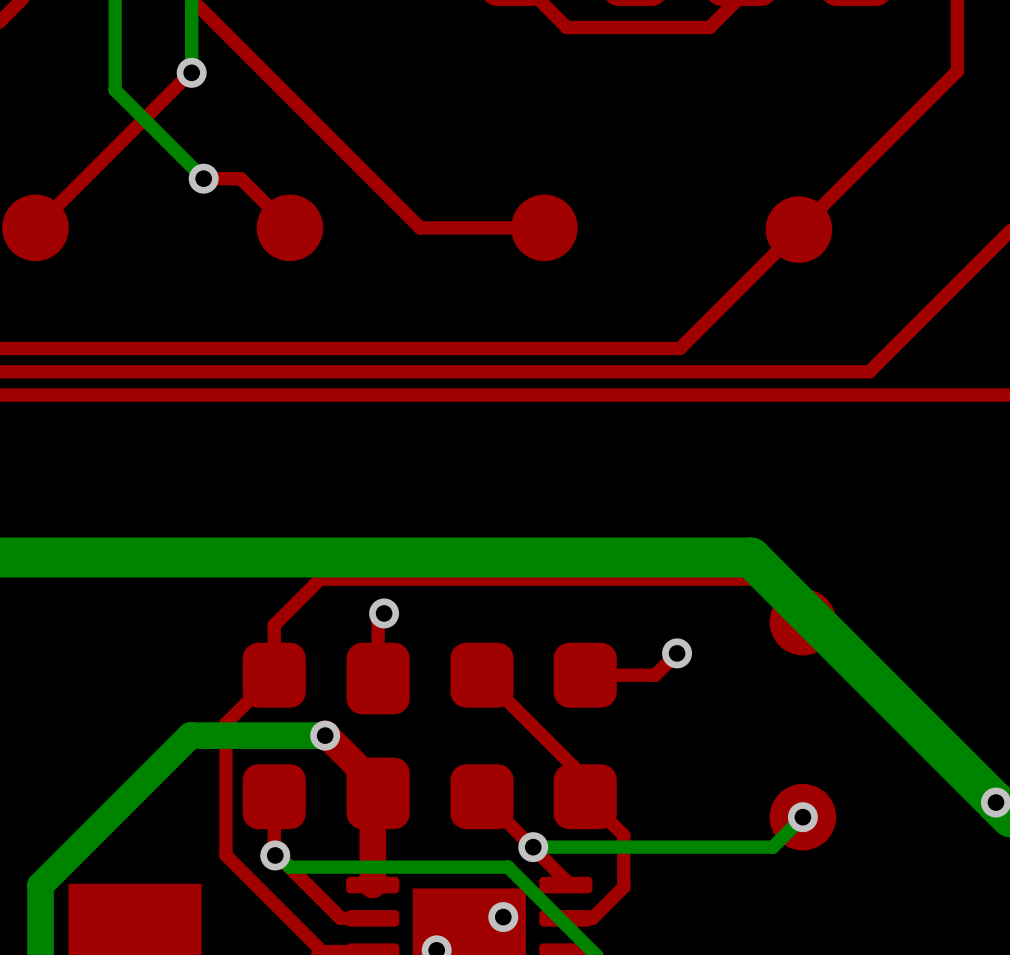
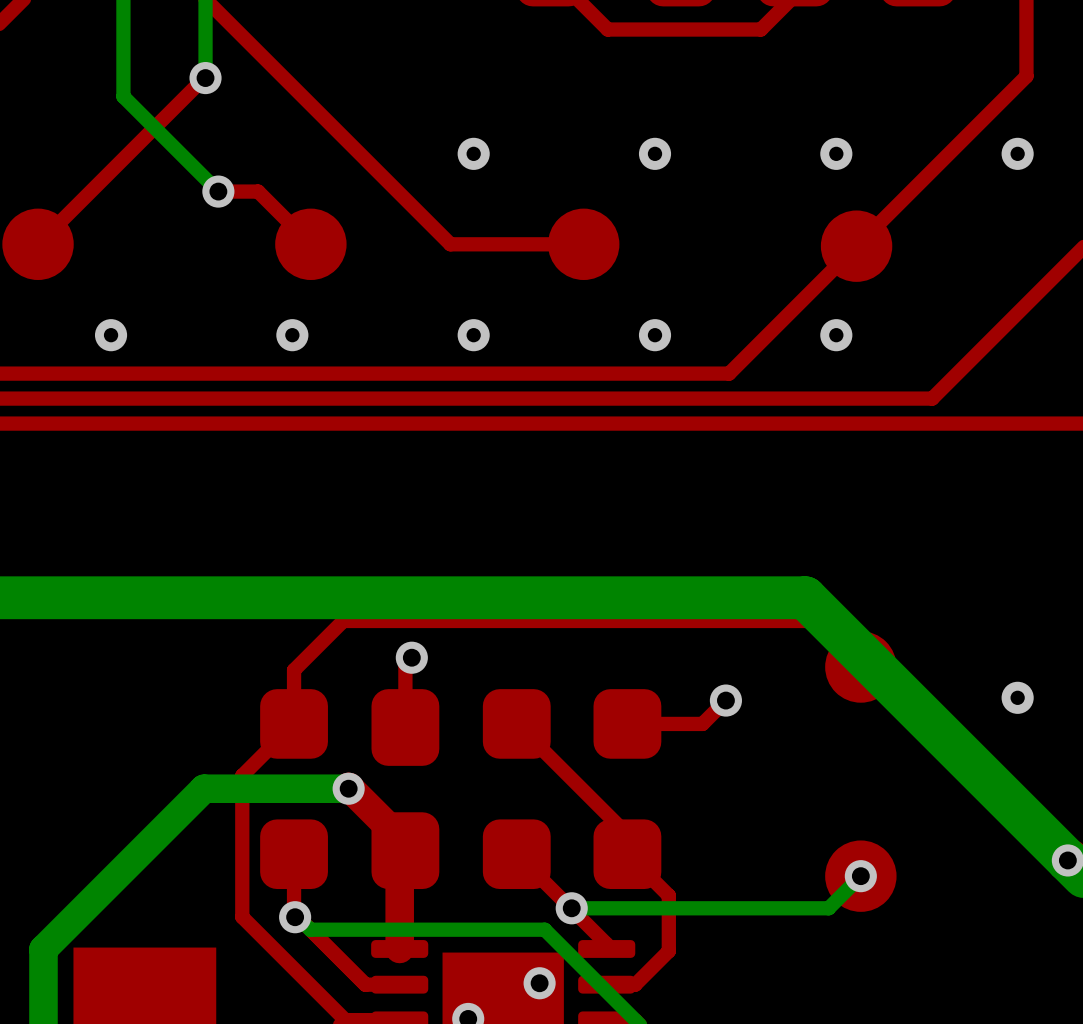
via: none -> (473, 153)
via: none -> (655, 153)
via: none -> (836, 153)
via: none -> (1017, 153)
via: none -> (111, 335)
via: none -> (292, 335)
via: none -> (473, 335)
via: none -> (655, 335)
via: none -> (836, 335)
via: none -> (1017, 697)

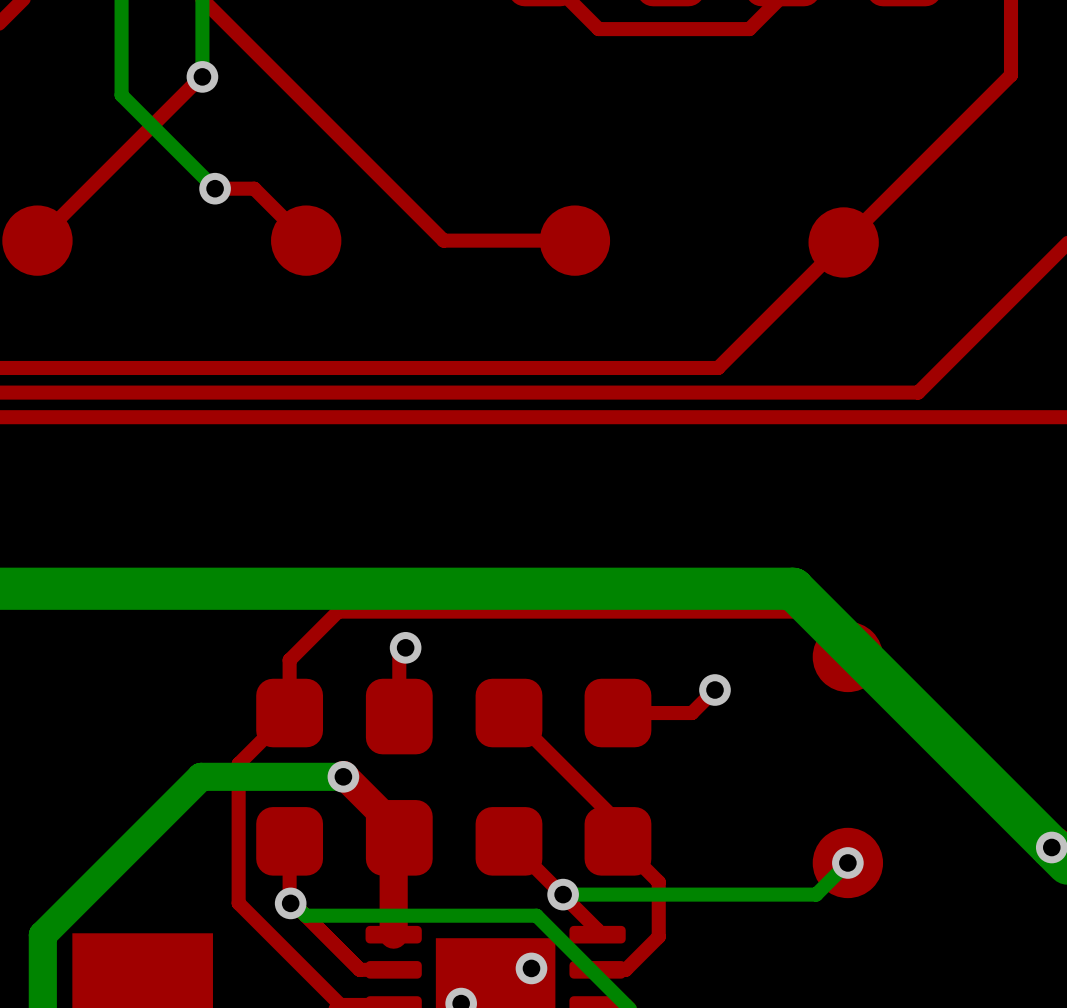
via: (473, 153) -> none
via: (655, 153) -> none
via: (836, 153) -> none
via: (1017, 153) -> none
via: (111, 335) -> none
via: (292, 335) -> none
via: (473, 335) -> none
via: (655, 335) -> none
via: (836, 335) -> none
via: (1017, 697) -> none

